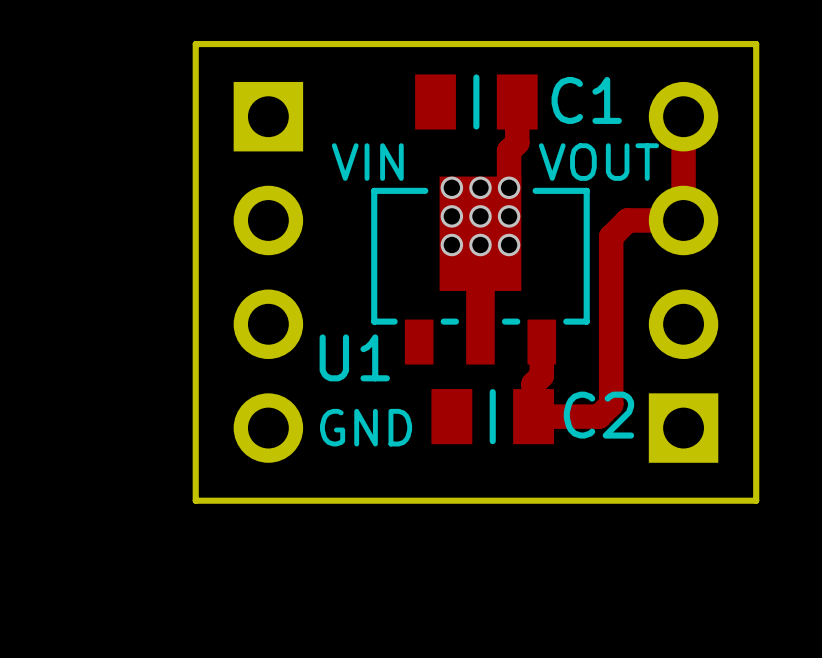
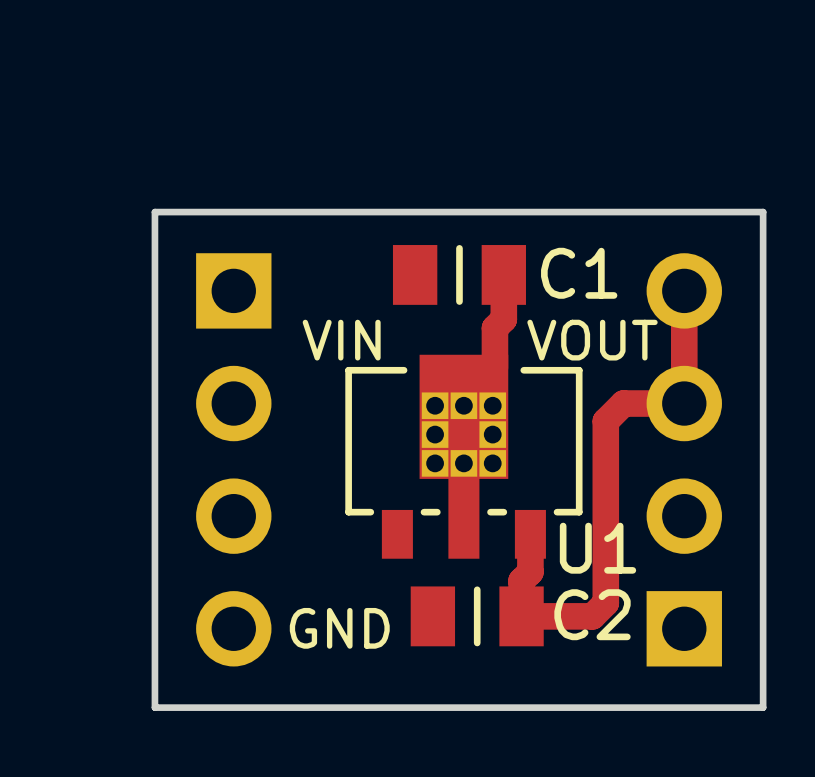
U1 footprint: [371, 176, 590, 365] -> [345, 354, 583, 559]
via: (451, 187) -> none
via: (480, 187) -> none
via: (509, 187) -> none
via: (451, 216) -> none
via: (480, 216) -> none
via: (509, 216) -> none
via: (451, 245) -> none
via: (480, 245) -> none
via: (509, 245) -> none
U1 name position: U1 (354, 357) -> U1 (597, 548)

